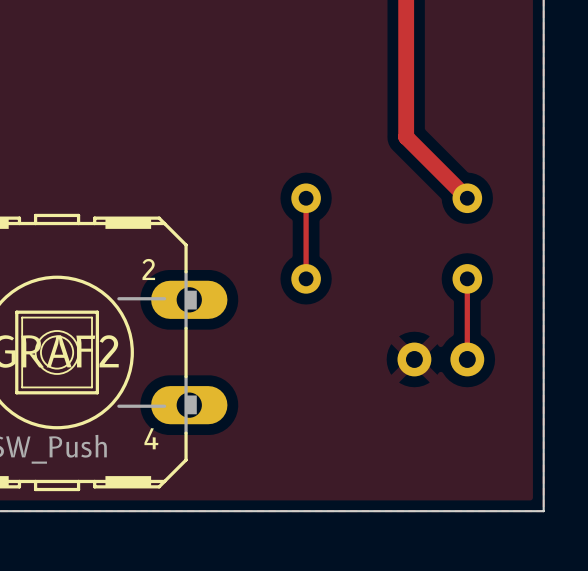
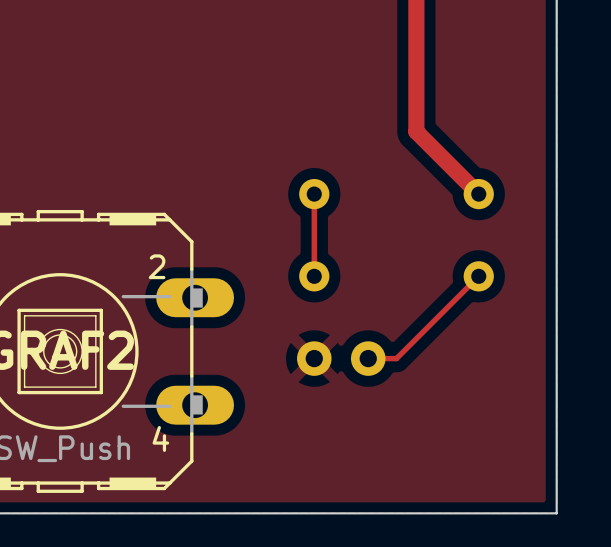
track: (467, 278) (467, 359) -> (478, 276) (396, 358) (368, 358)
part position: (440, 359) -> (341, 358)

